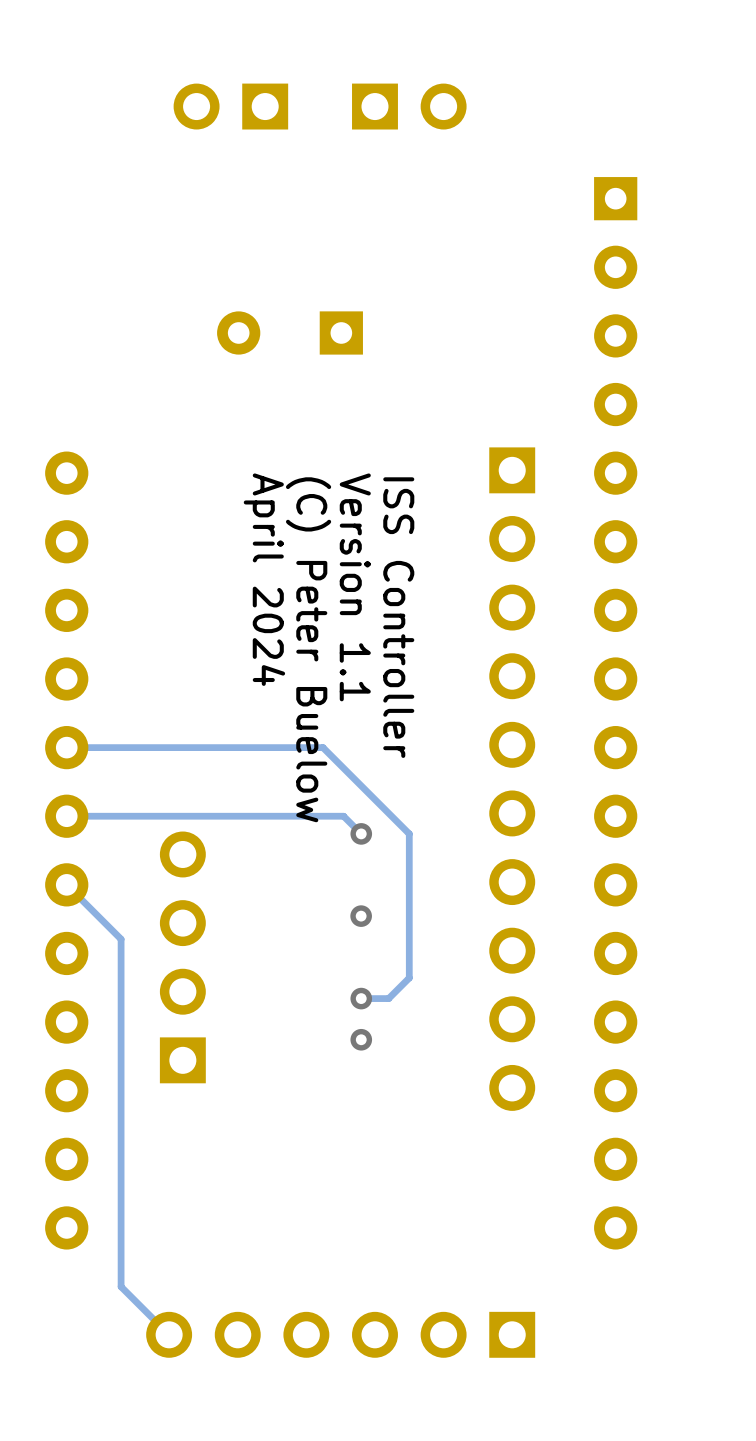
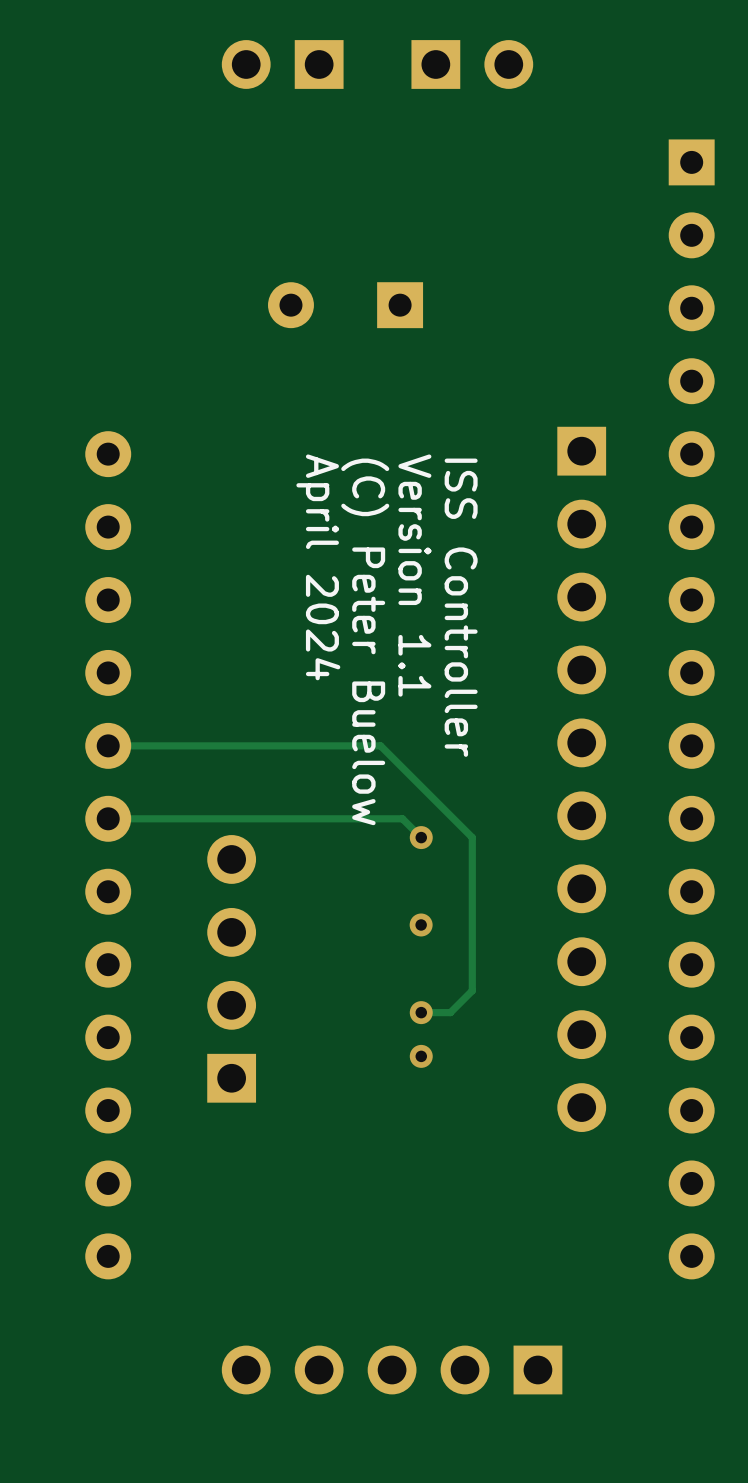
track: (66, 884) (121, 939) (121, 1286) (169, 1334) -> none
part footprint: [146, 1311, 536, 1358] -> [221, 1345, 563, 1395]

